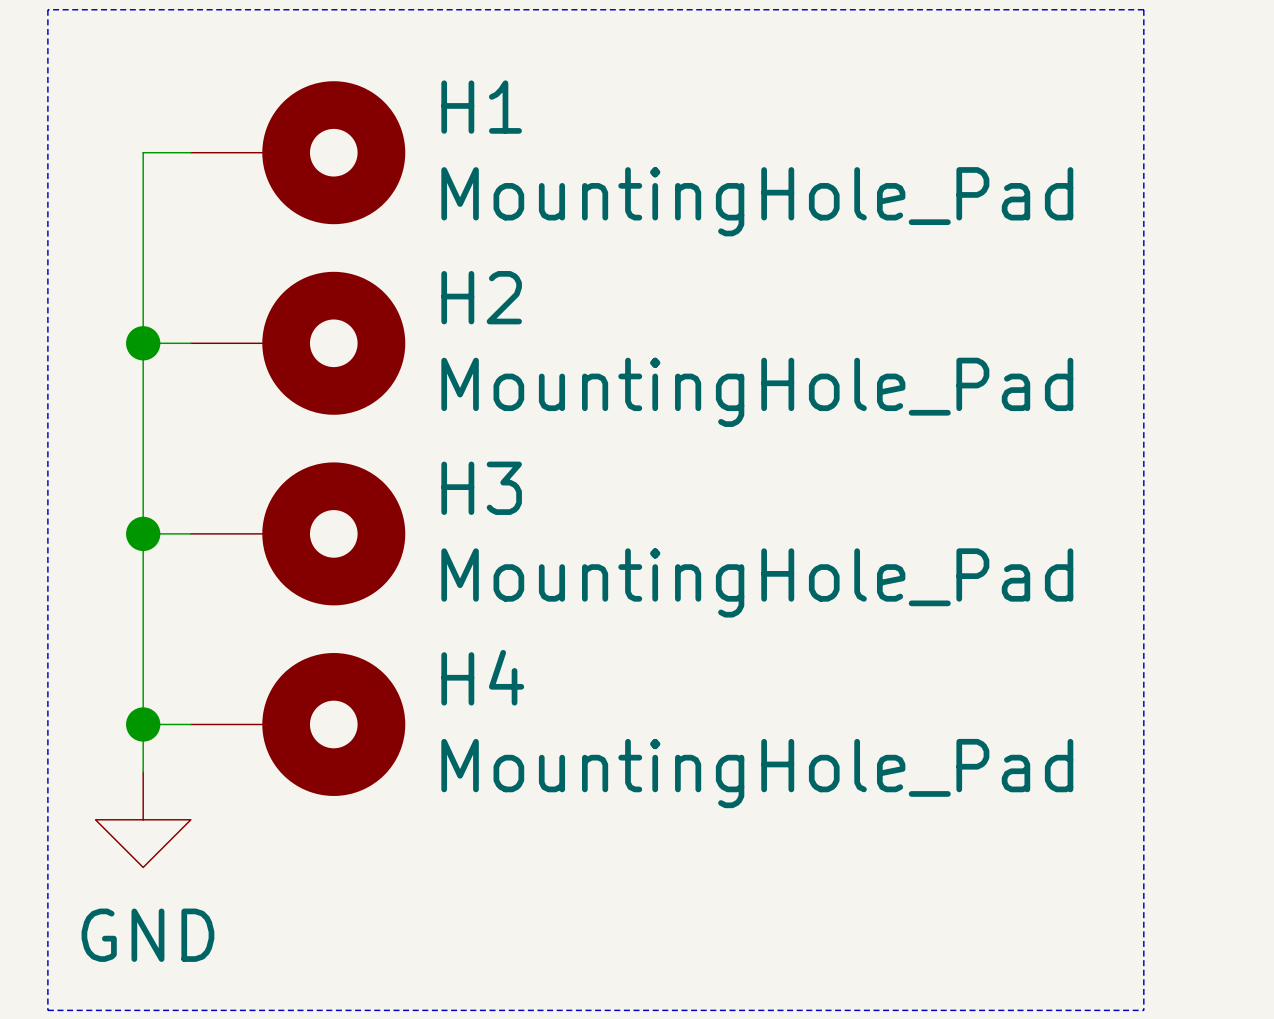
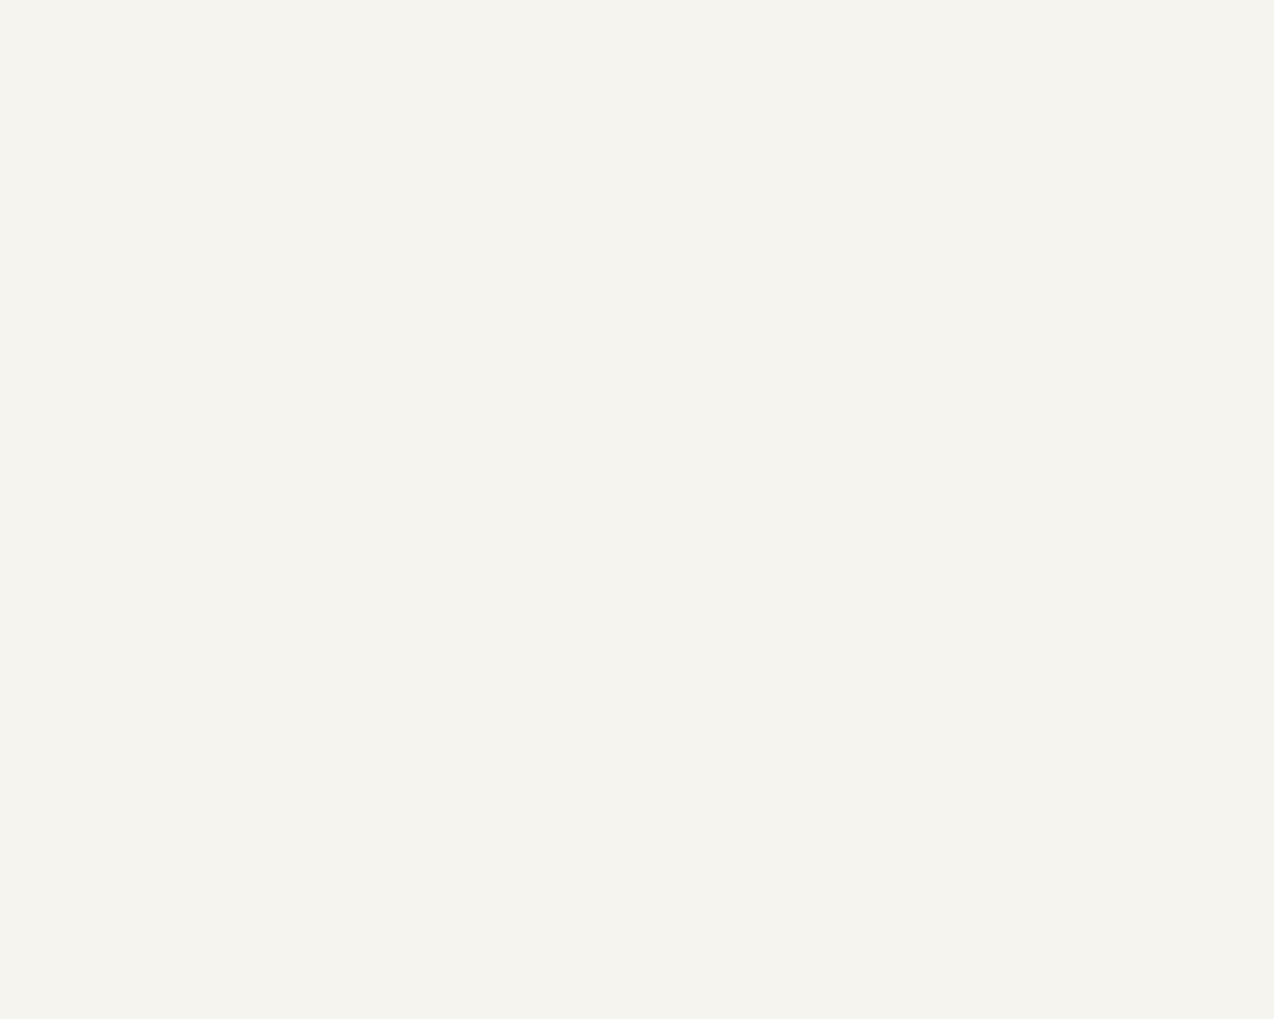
line: (47, 9) (1143, 9) (1143, 1010) (47, 1010) (47, 9) -> none
wire: (190, 152) (143, 152) (143, 772) -> none
H1: MountingHole_Pad (298, 152) -> none
wire: (143, 343) (190, 343) -> none
junction: (143, 343) -> none
H2: MountingHole_Pad (298, 343) -> none
wire: (143, 533) (190, 533) -> none
junction: (143, 533) -> none
H3: MountingHole_Pad (298, 533) -> none
wire: (143, 724) (190, 724) -> none
junction: (143, 724) -> none
H4: MountingHole_Pad (298, 724) -> none
power symbol: GND (143, 819) -> none

